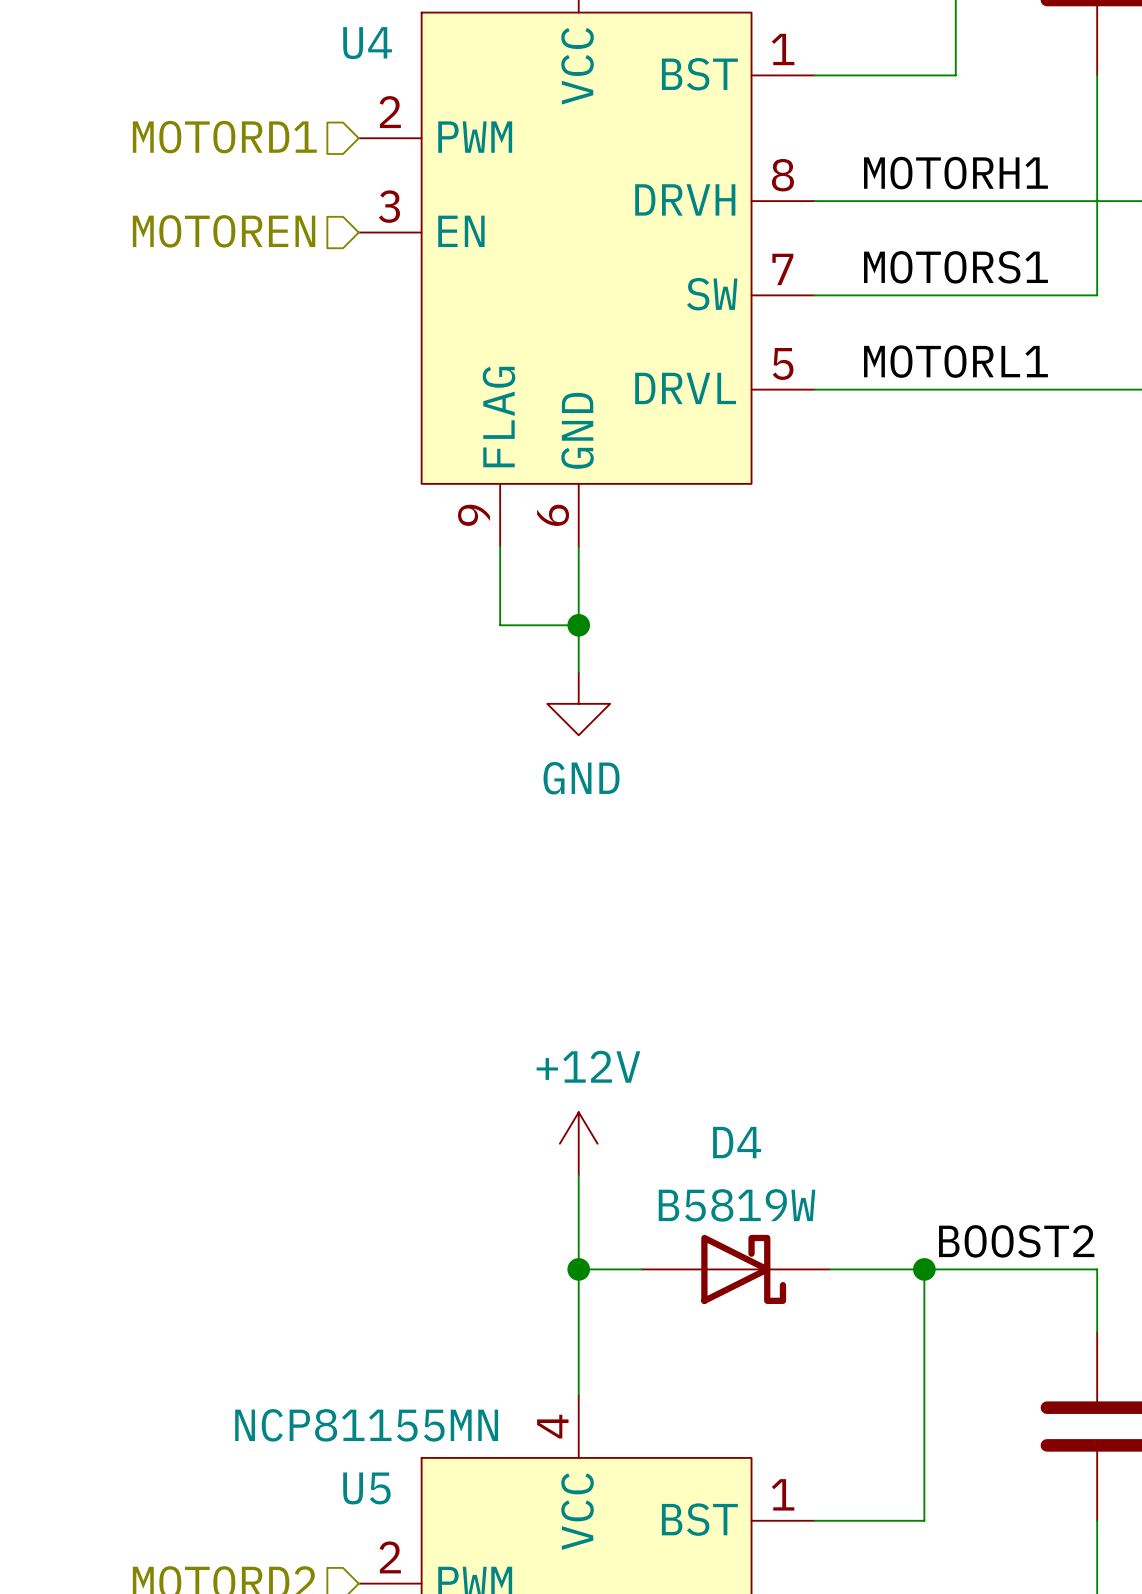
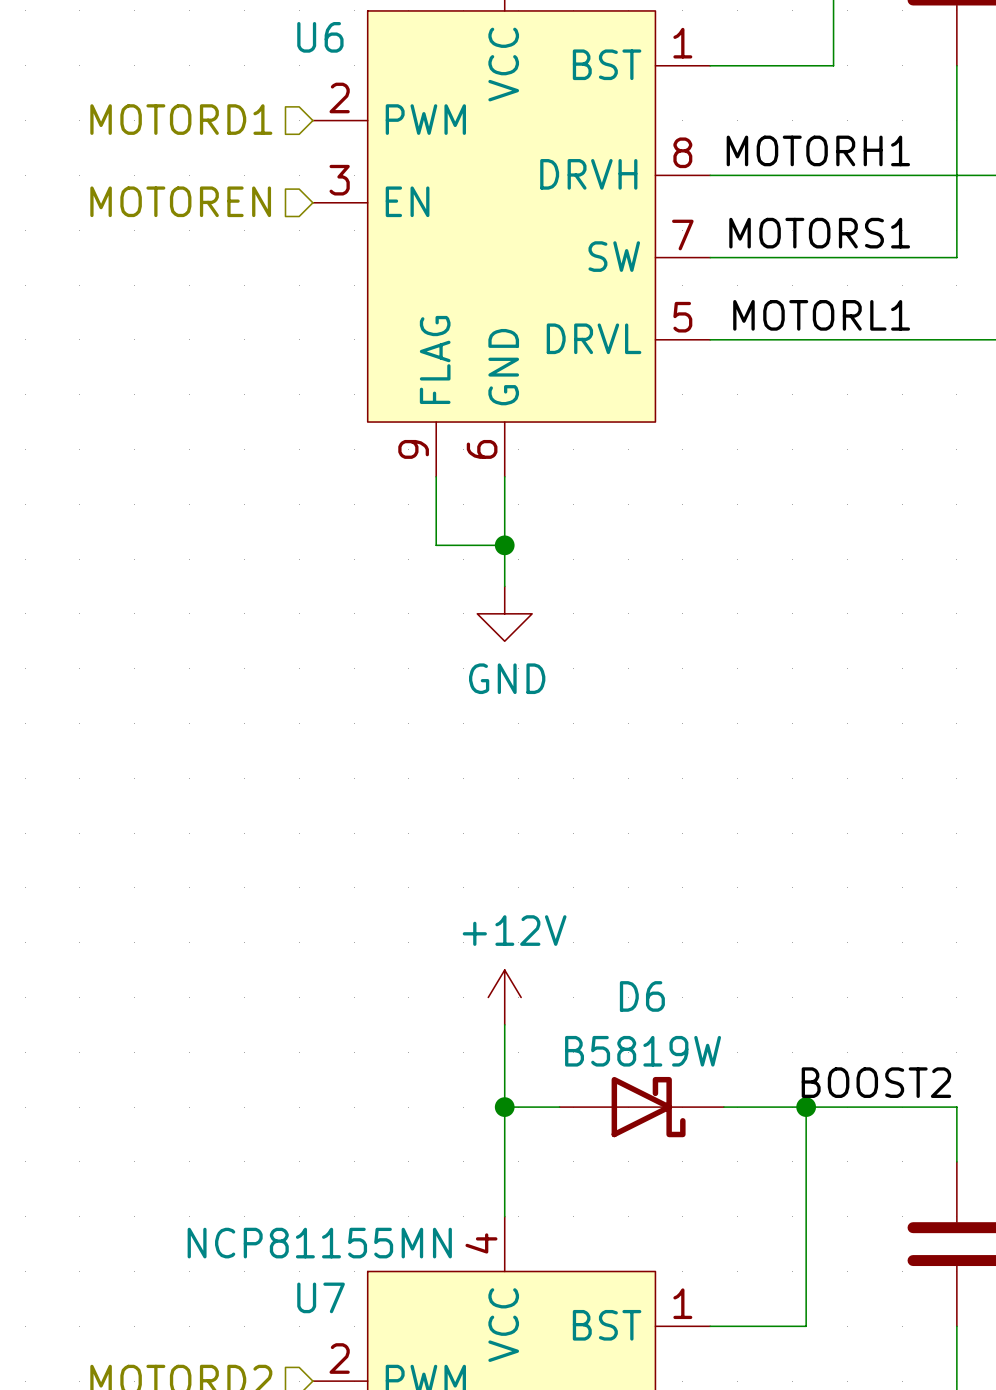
U4 name: U4 (367, 43) -> U6 (320, 37)
D4 name: D4 (737, 1142) -> D6 (642, 996)
U5 name: U5 (366, 1488) -> U7 (321, 1297)

